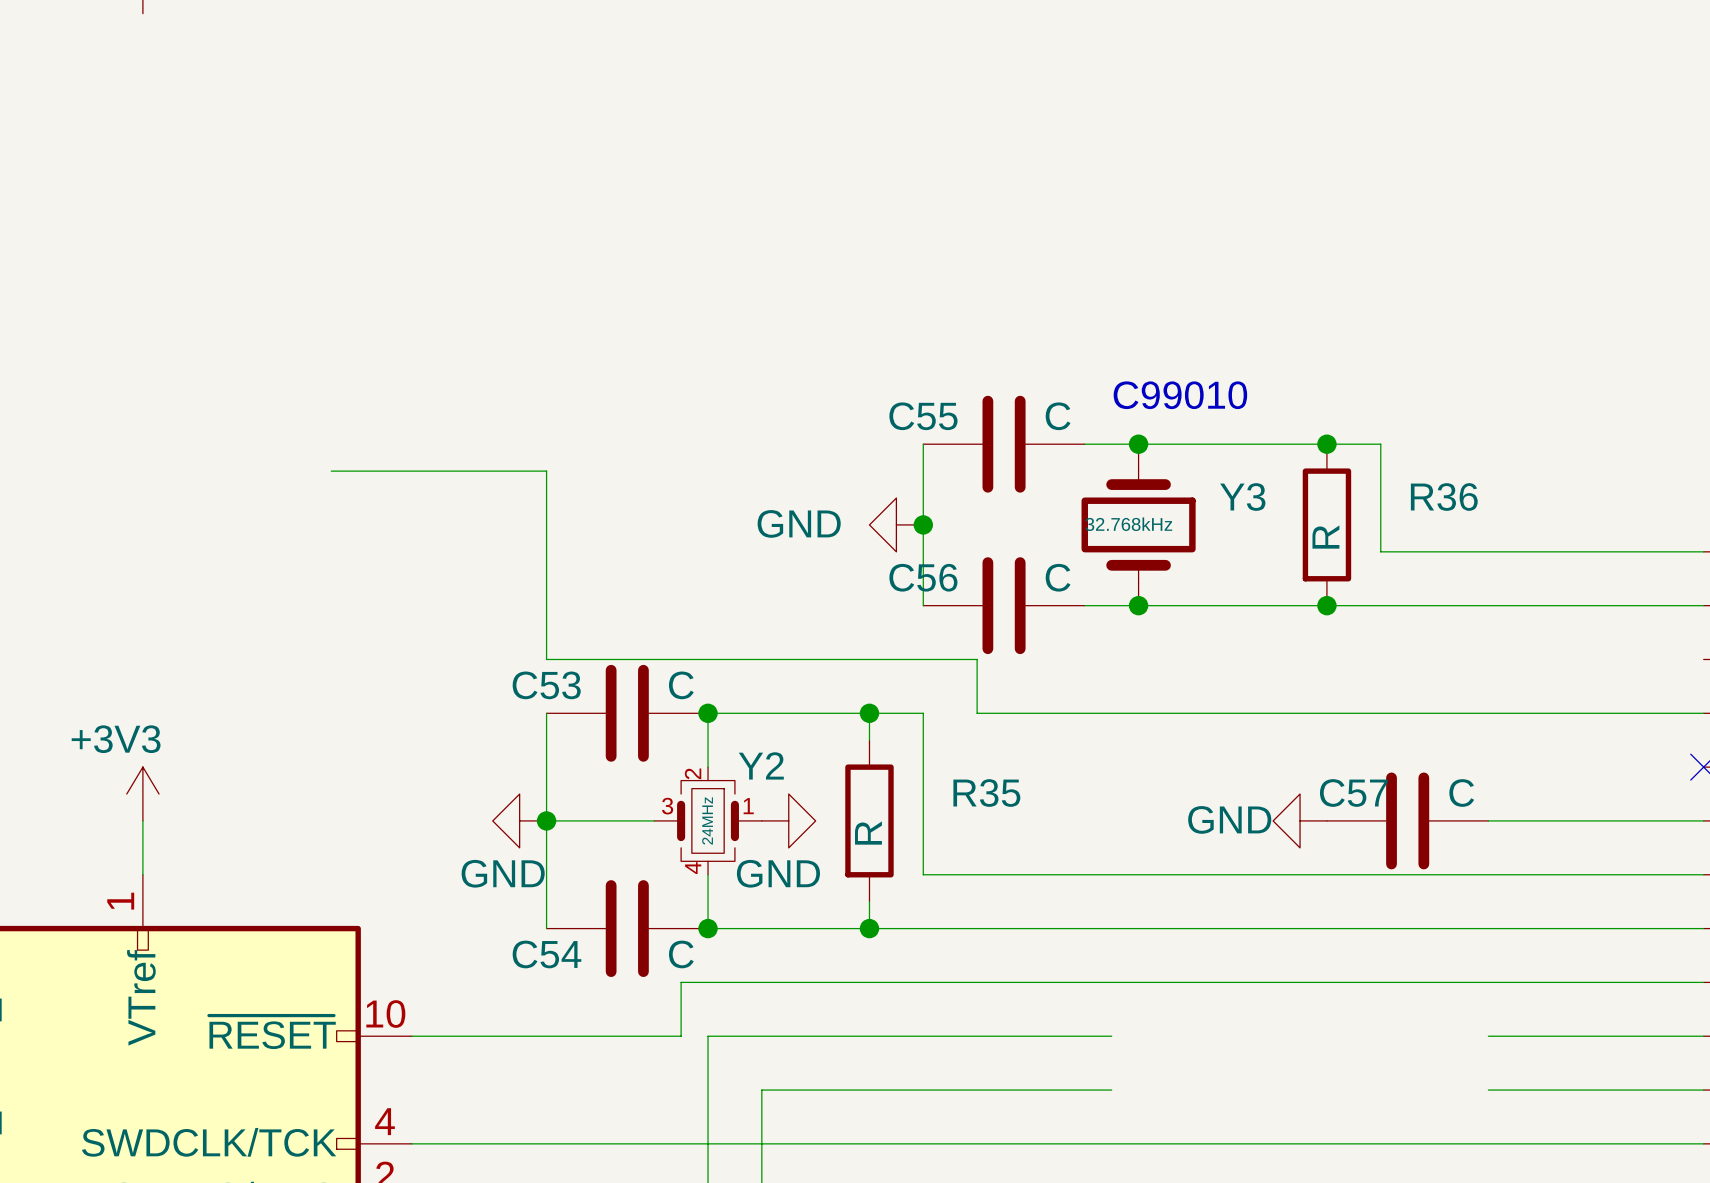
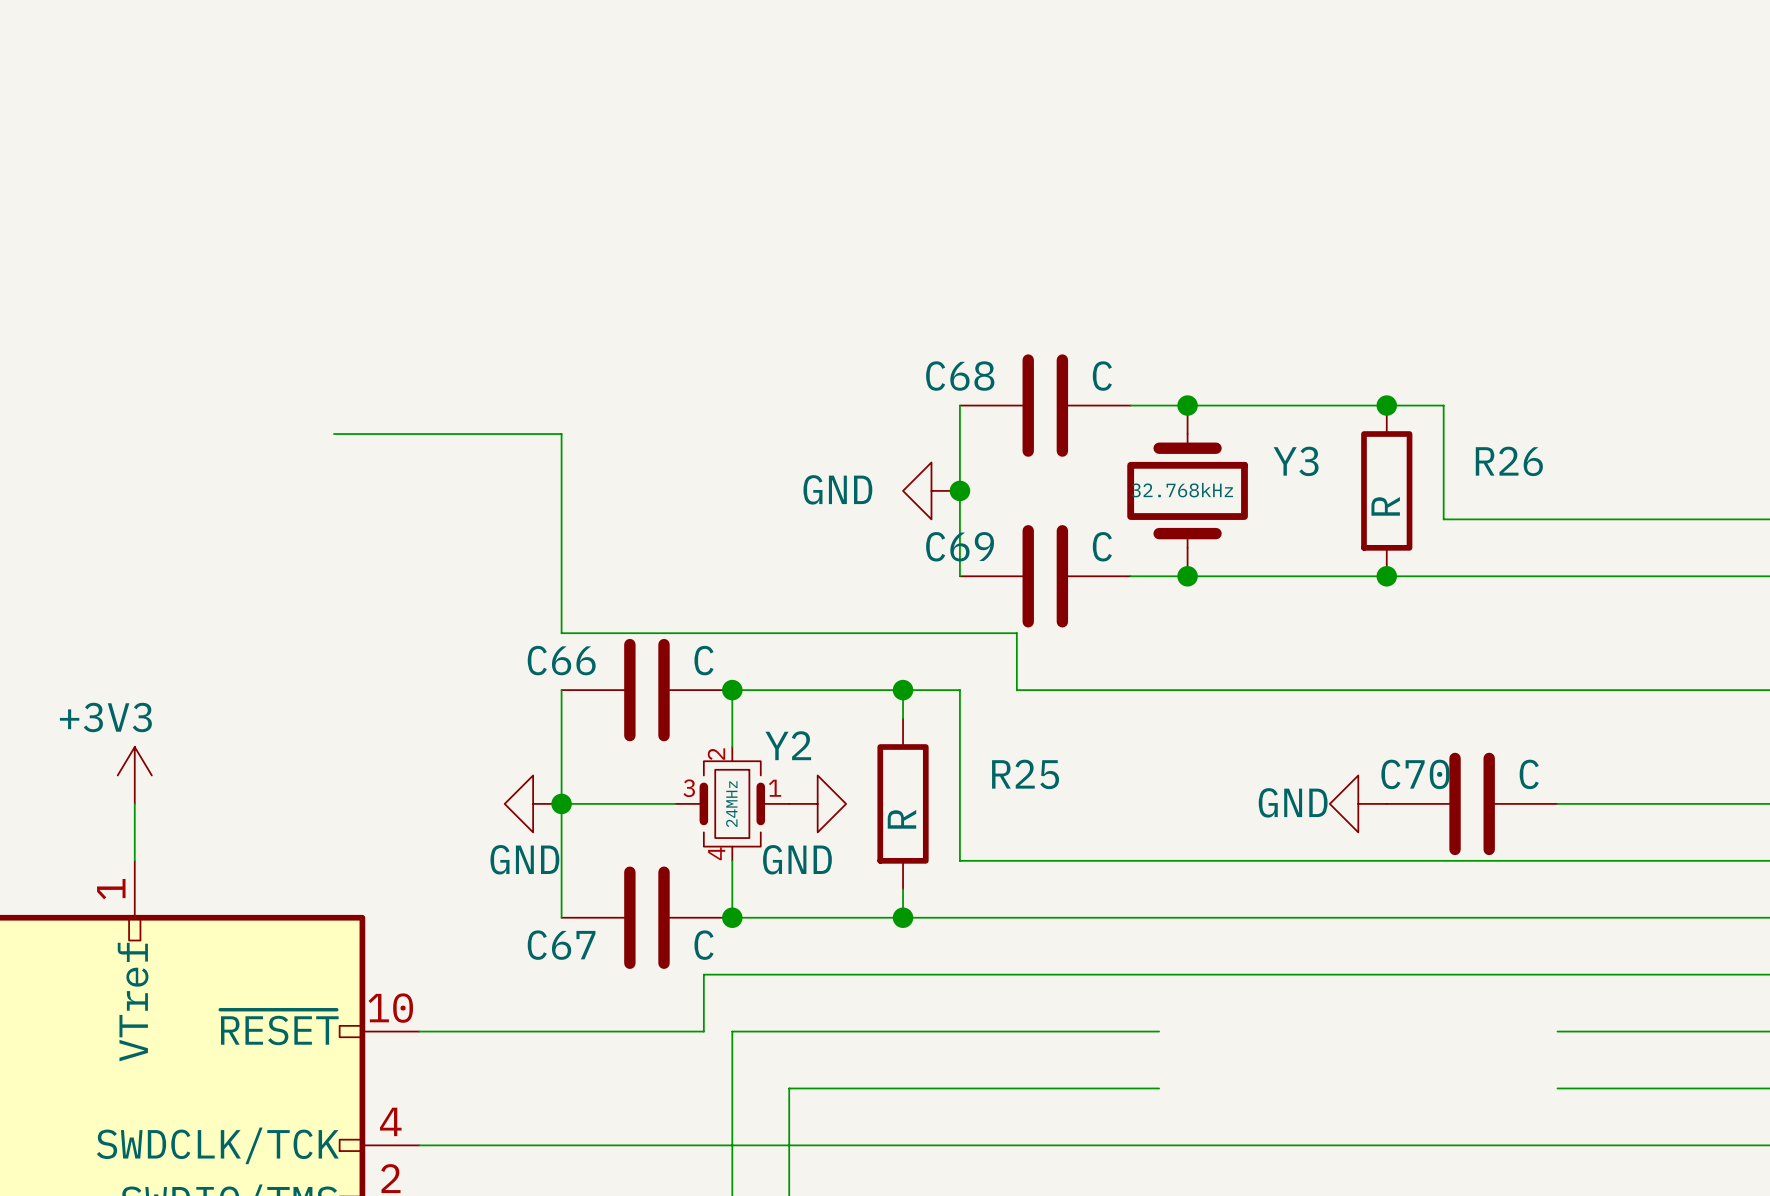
text: C99010 (1180, 395) -> none
C55 name: C55 (923, 416) -> C68 (960, 376)
R36 name: R36 (1444, 497) -> R26 (1509, 461)
C56 name: C56 (923, 577) -> C69 (960, 546)
C53 name: C53 (546, 685) -> C66 (561, 660)
R35 name: R35 (986, 793) -> R25 (1025, 774)
C57 name: C57 (1353, 793) -> C70 (1415, 774)
C54 name: C54 (546, 954) -> C67 (561, 945)

